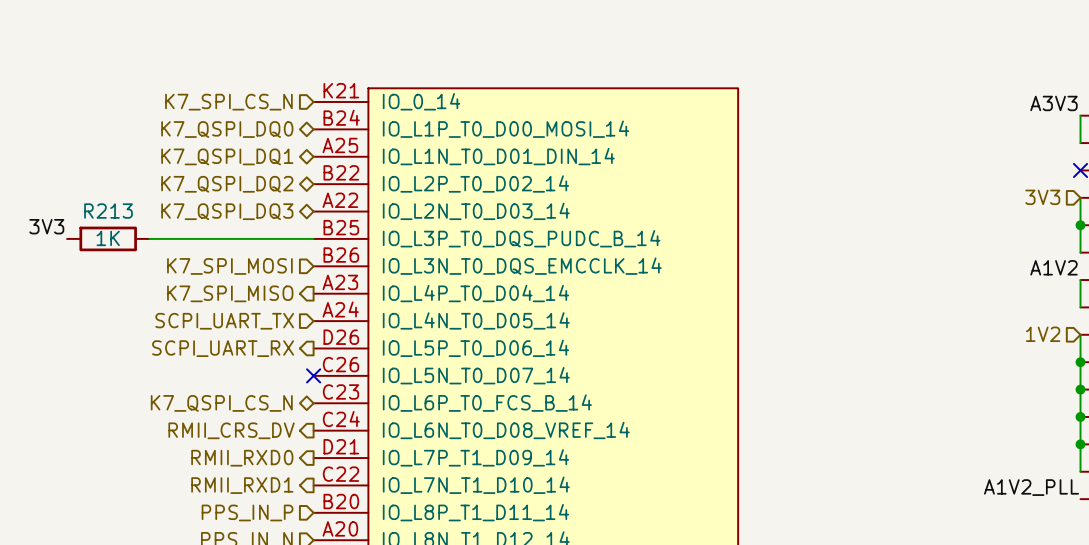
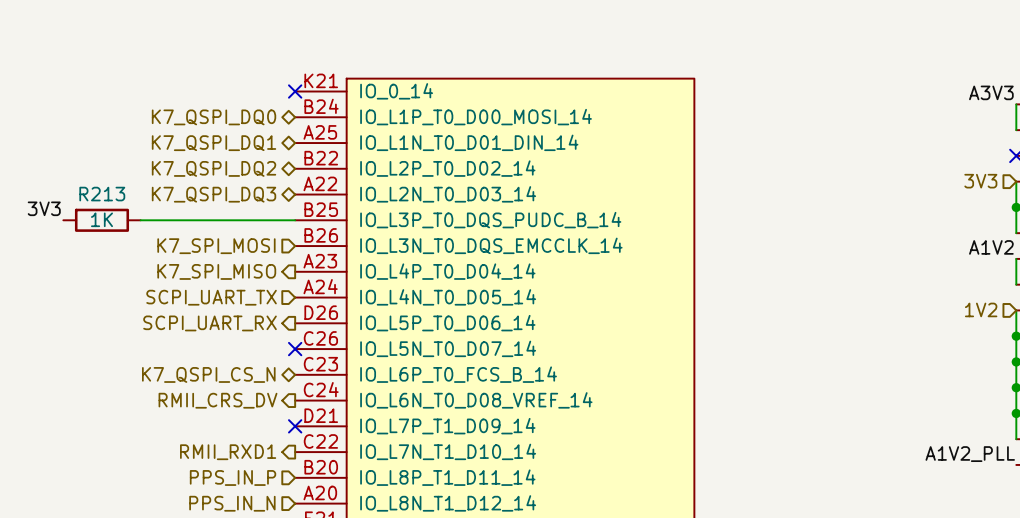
no-connect mark: none -> (295, 91)
hierarchical label: K7_SPI_CS_N (228, 102) -> none
hierarchical label: RMII_RXD0 (242, 458) -> none
no-connect mark: none -> (295, 426)

